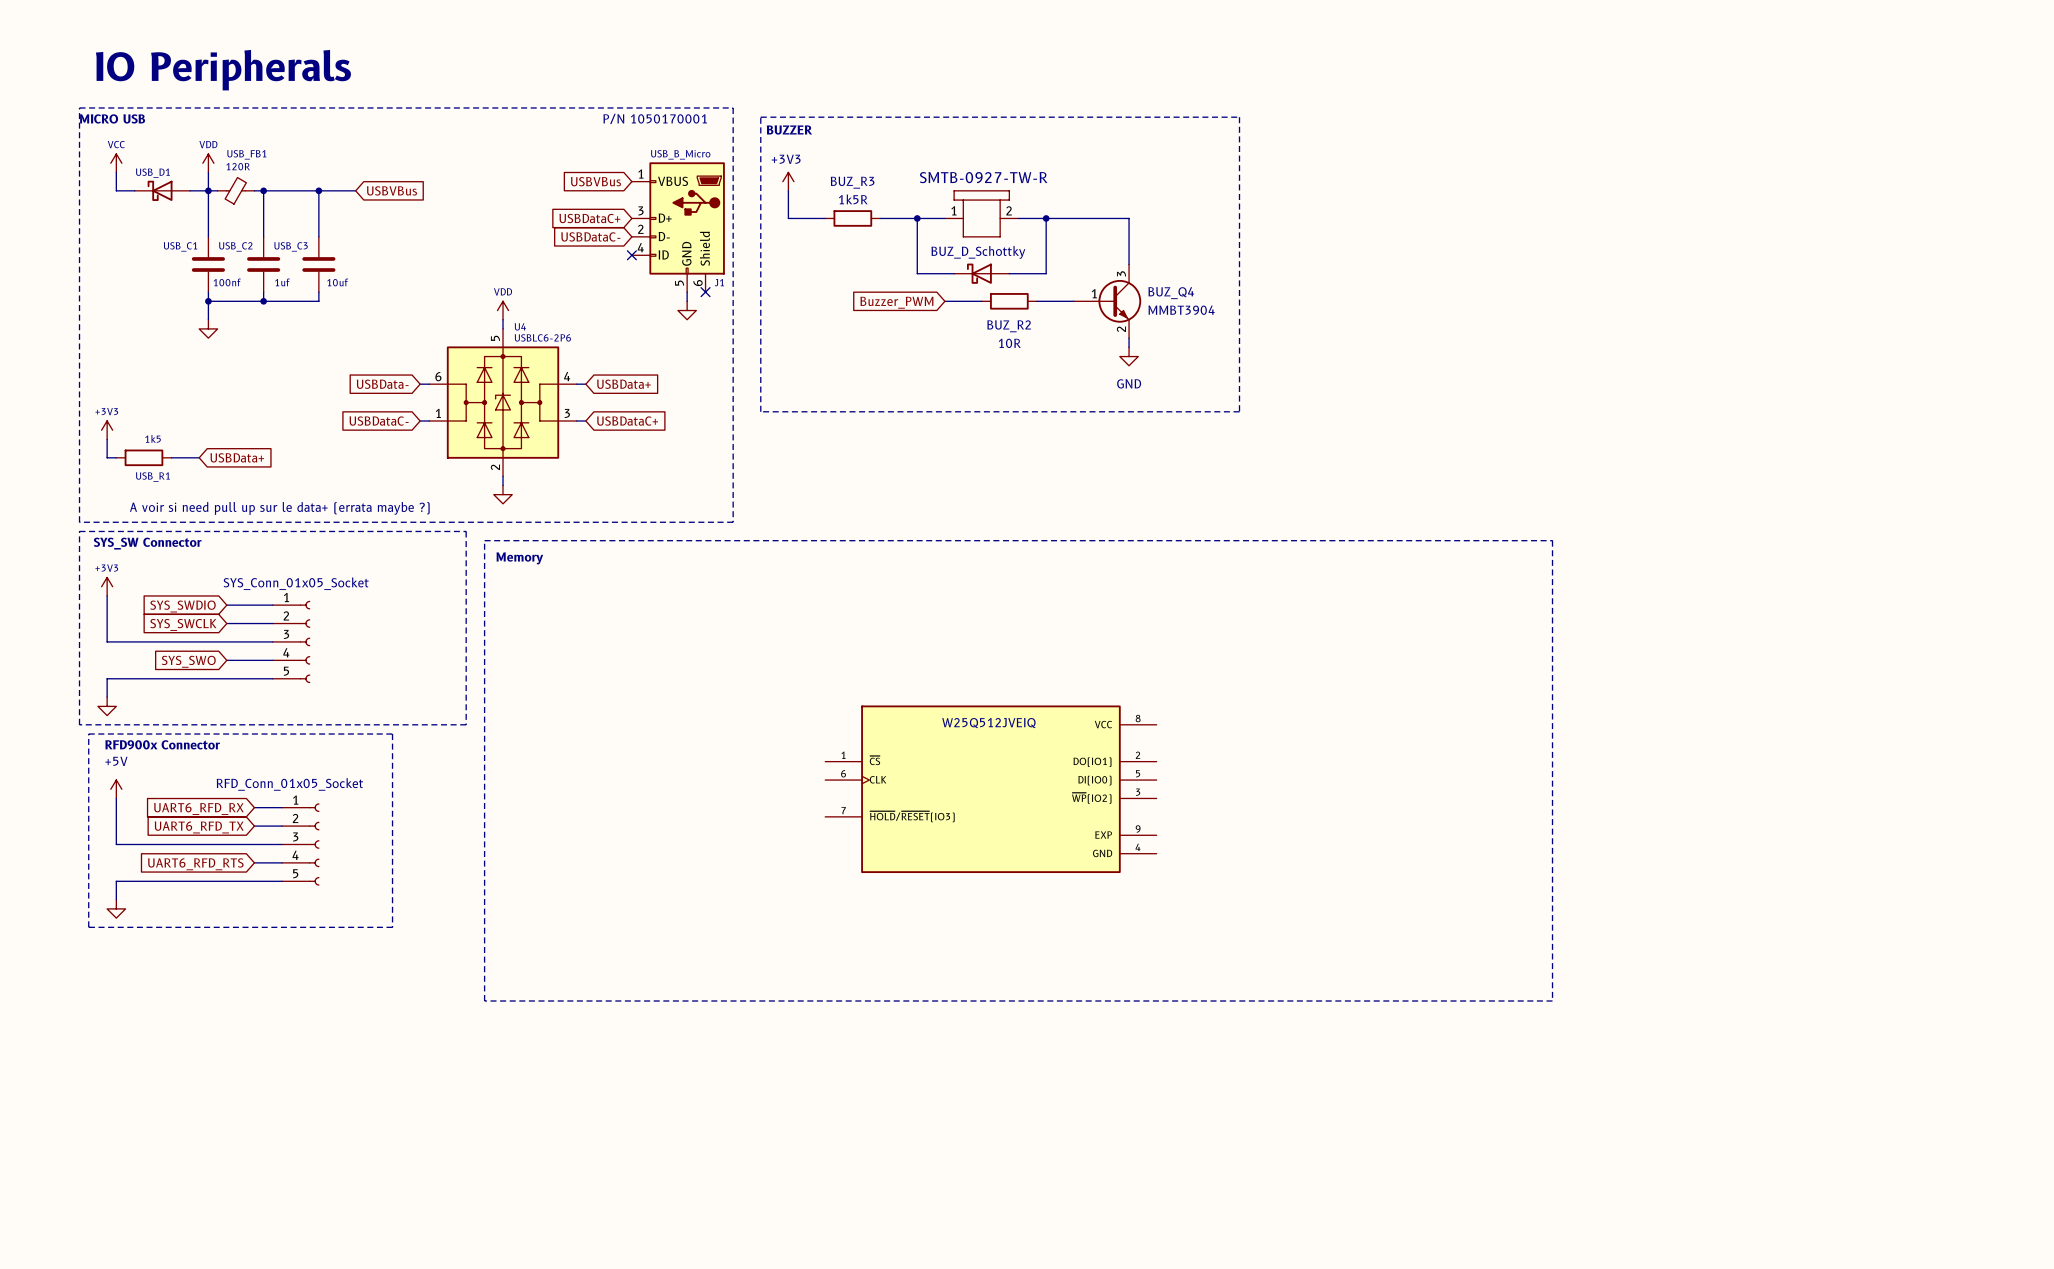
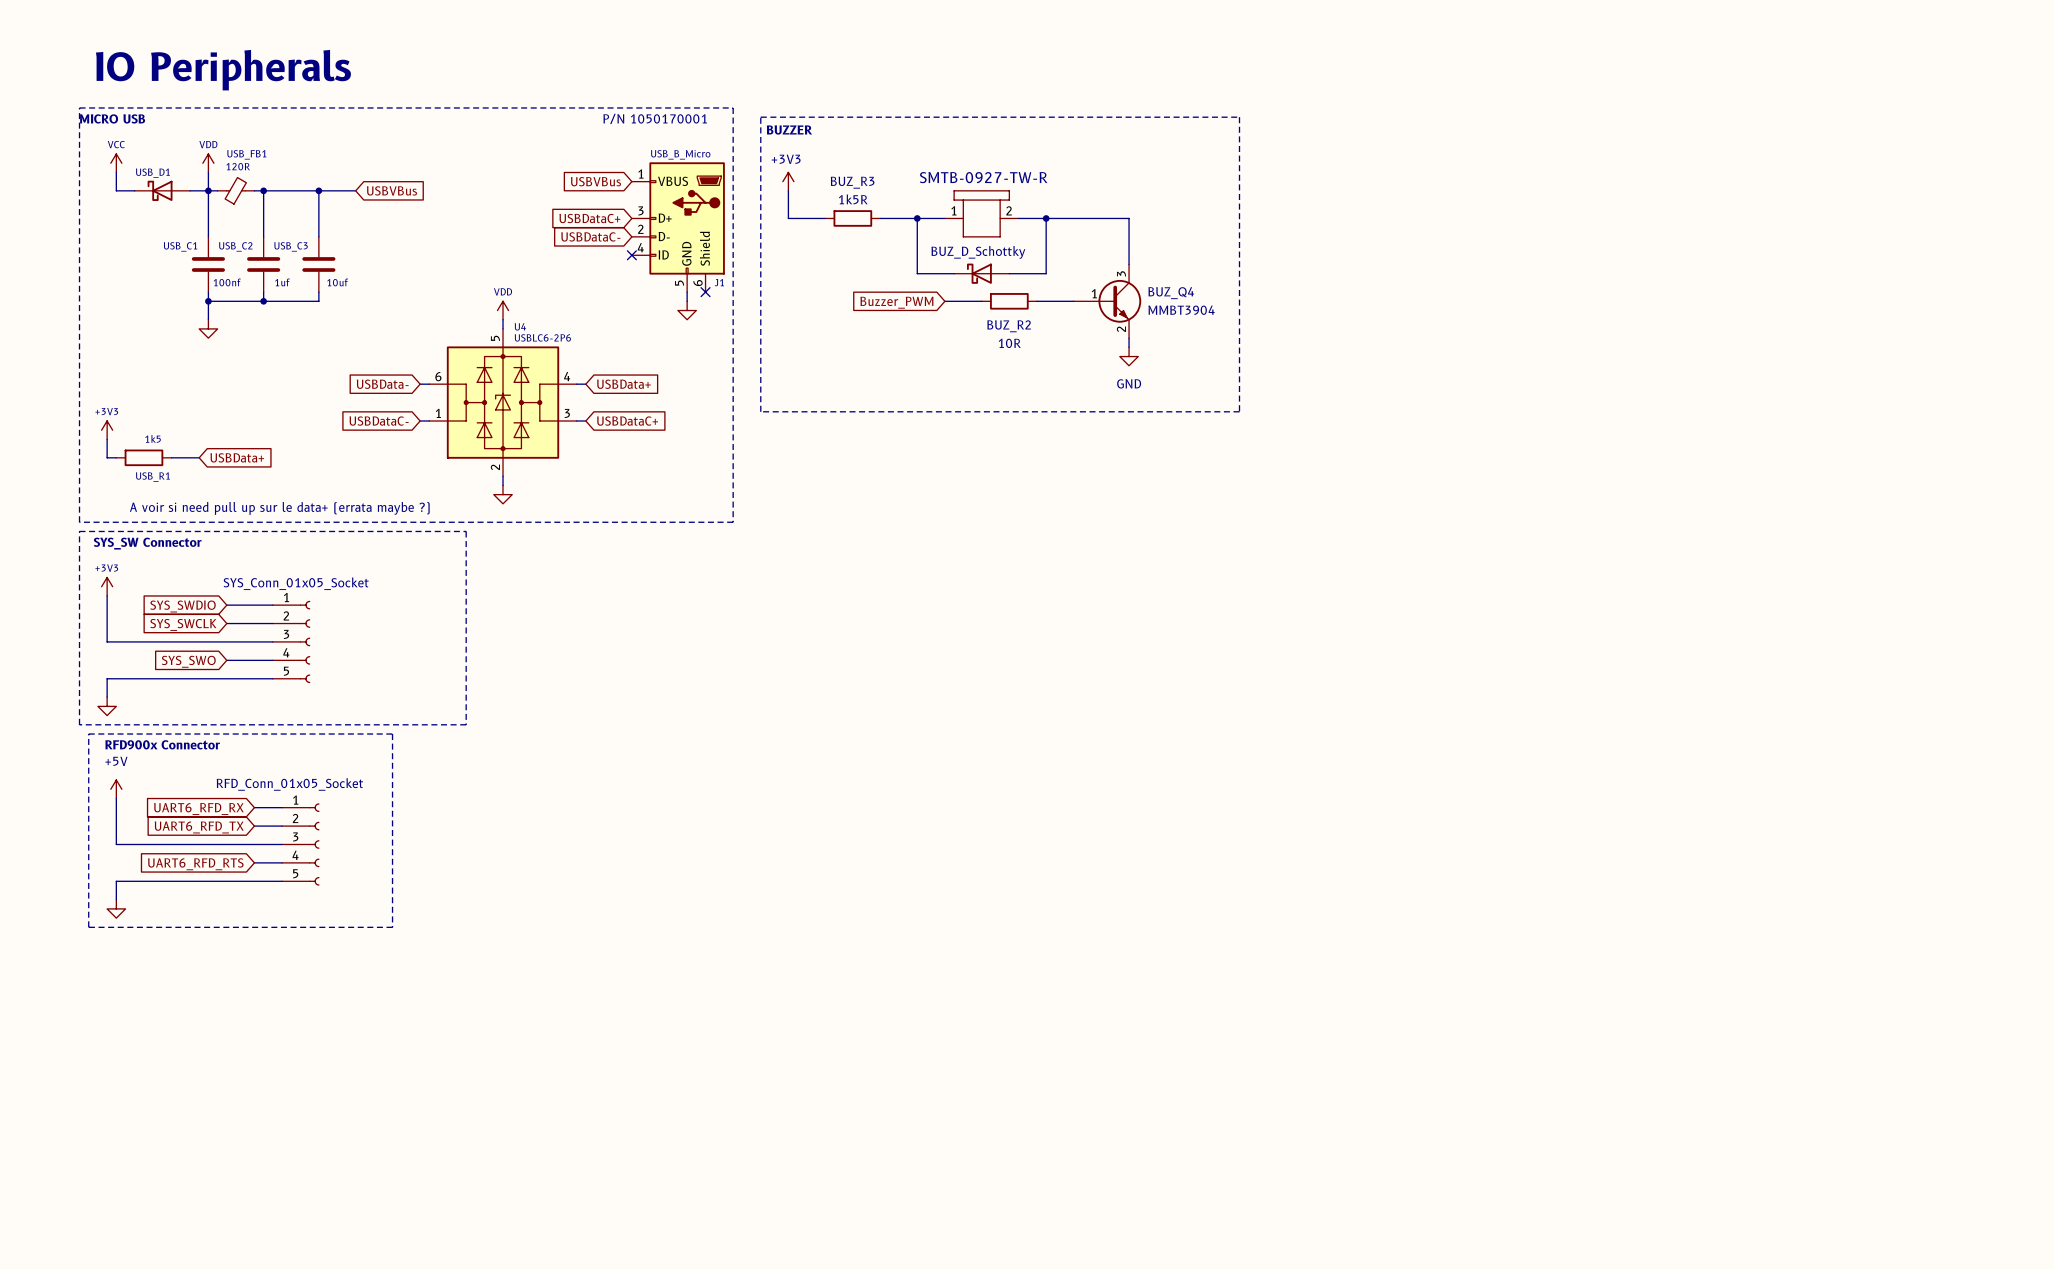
line: (484, 540) (1552, 540) (1552, 1000) (484, 1000) (484, 540) -> none
text: Memory (519, 558) -> none
part: W25Q512JVEIQ (990, 789) -> none

